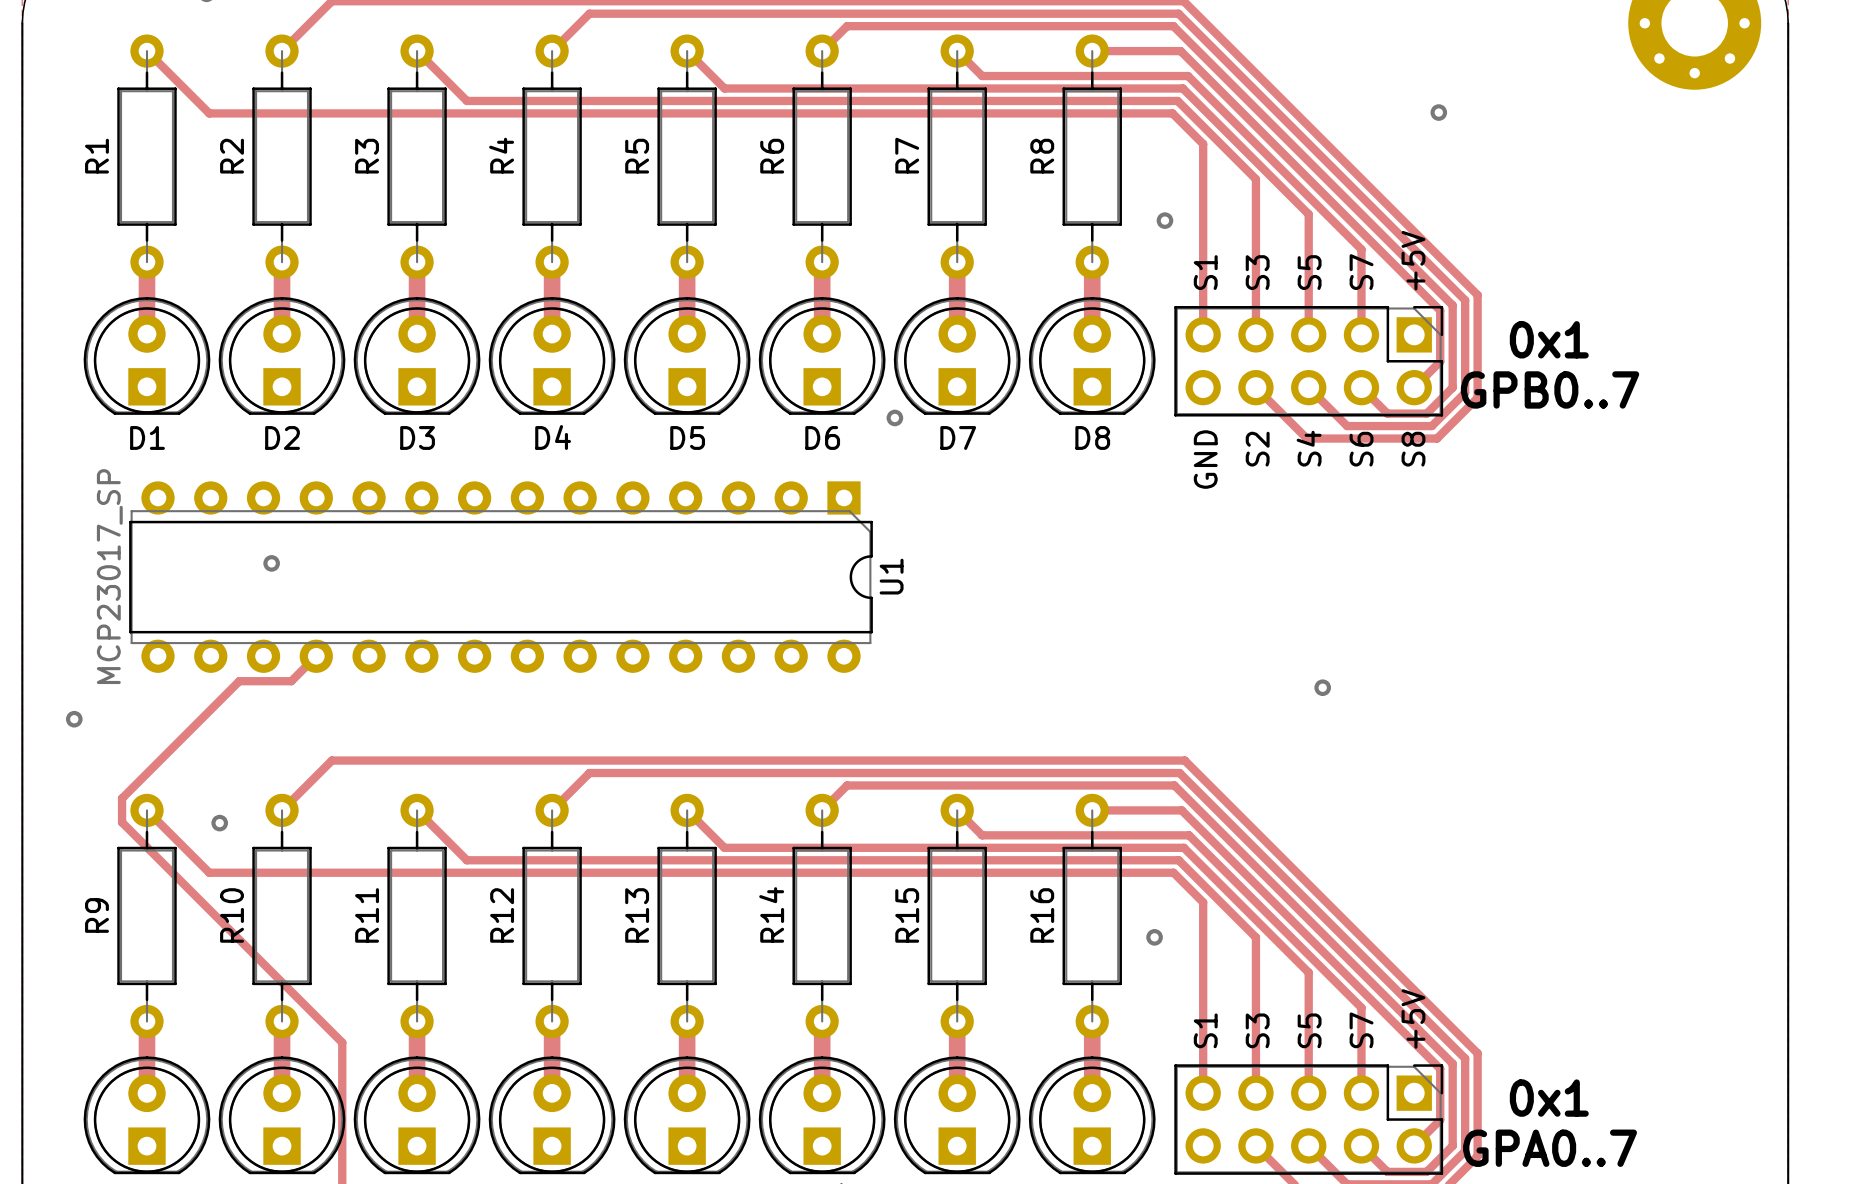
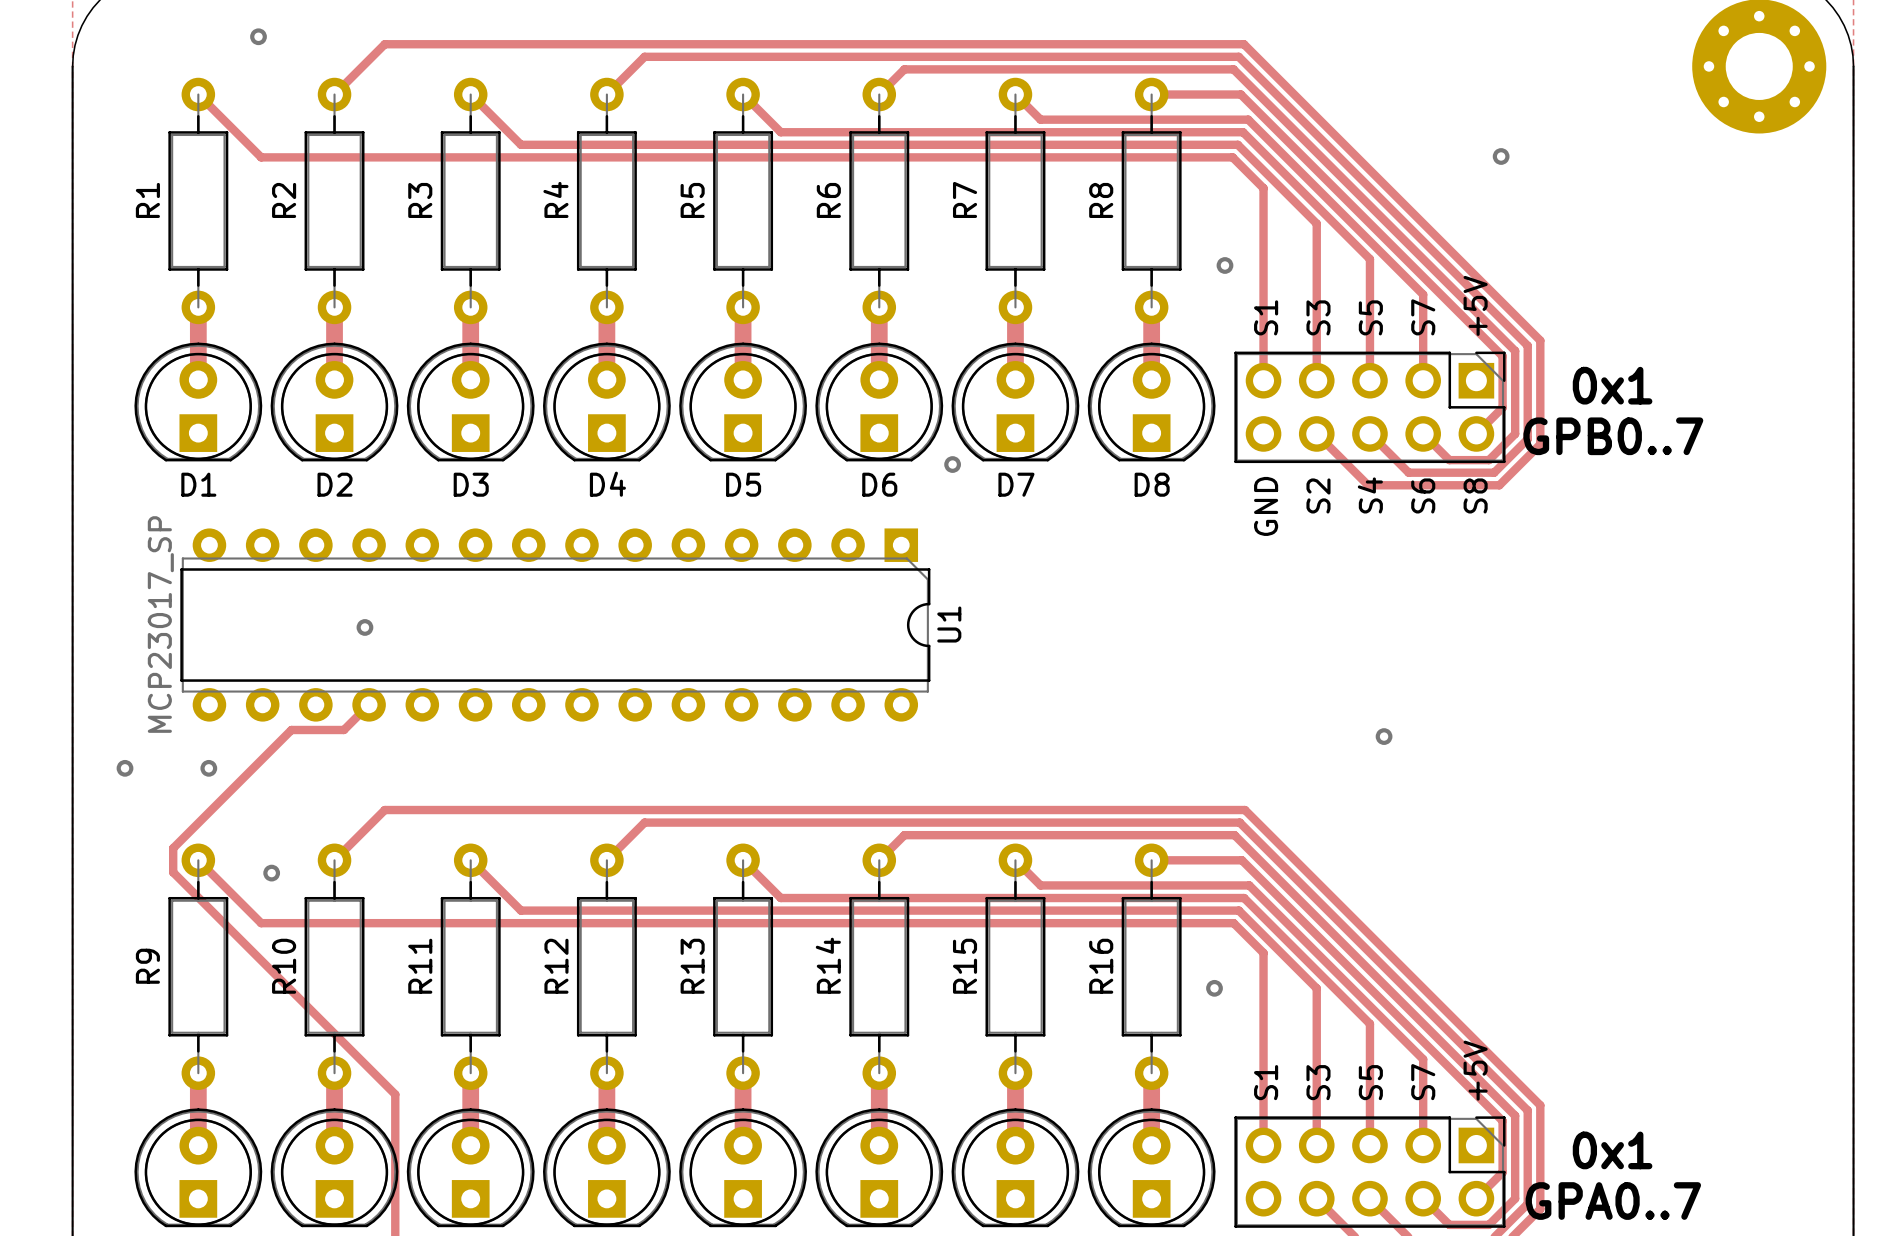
via position: (271, 563) -> (364, 627)
via: none -> (208, 768)

